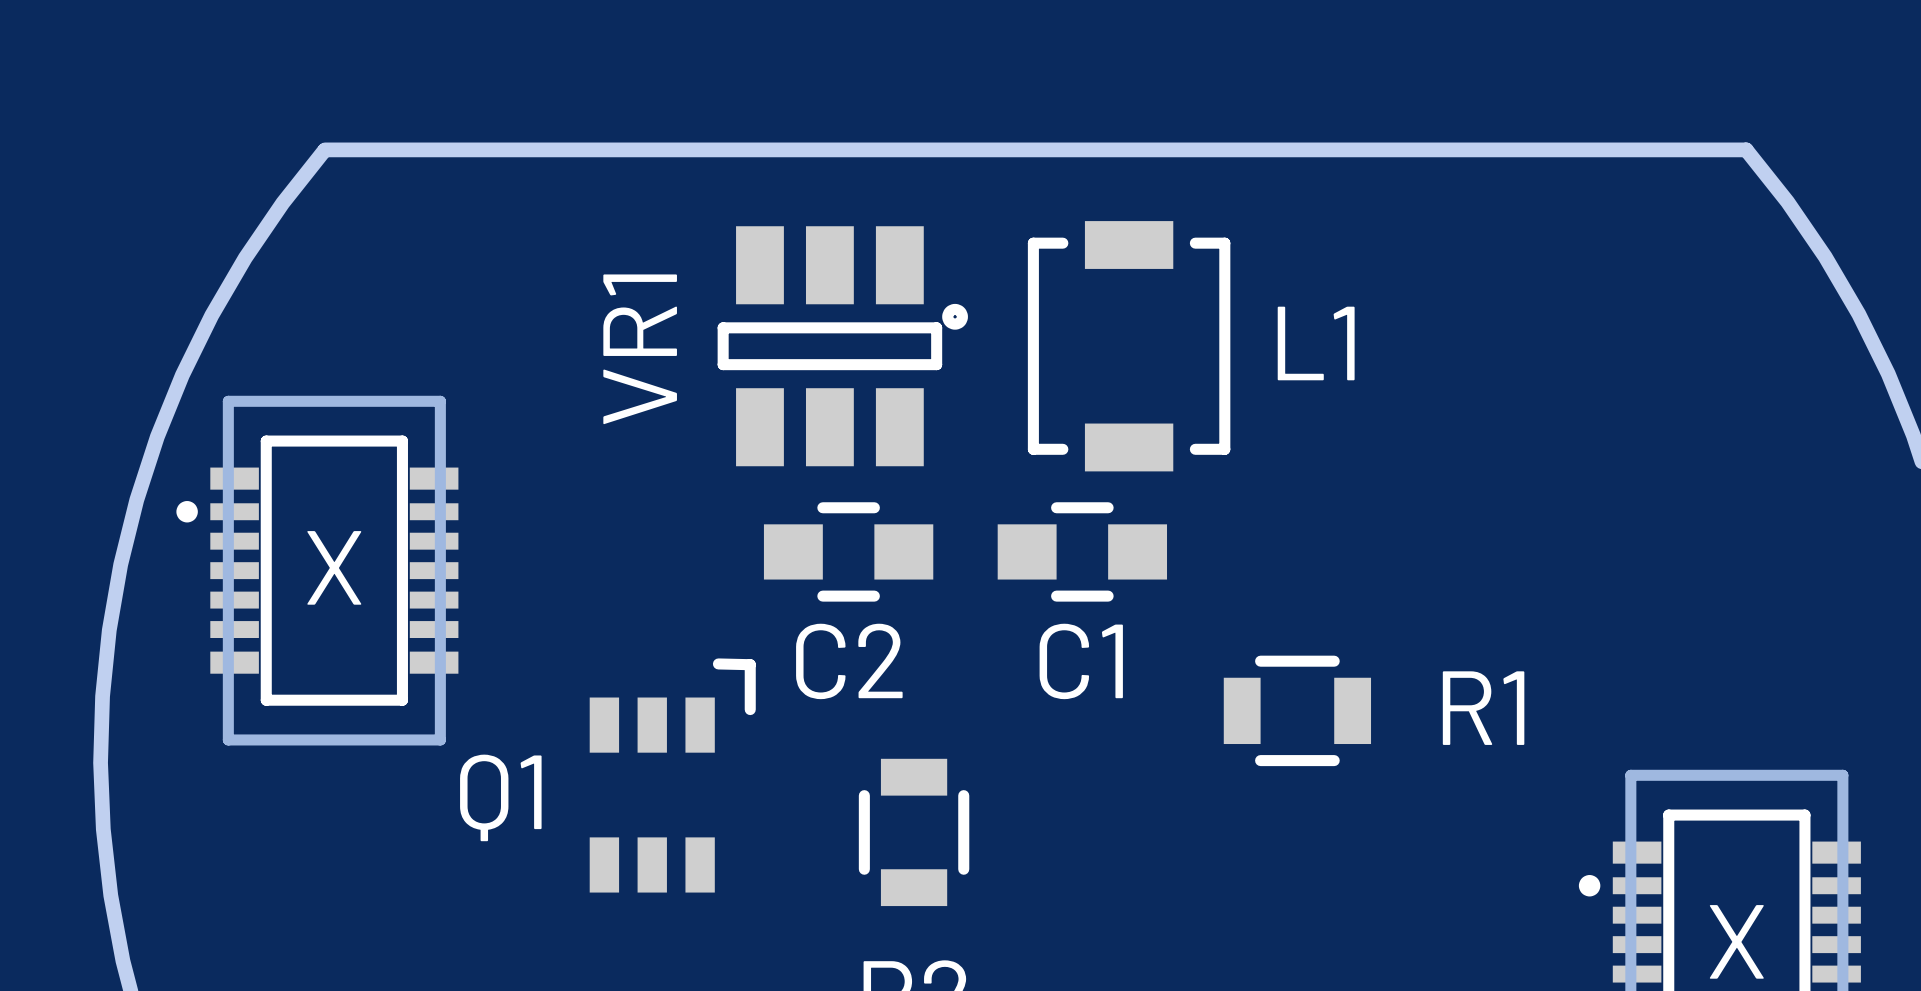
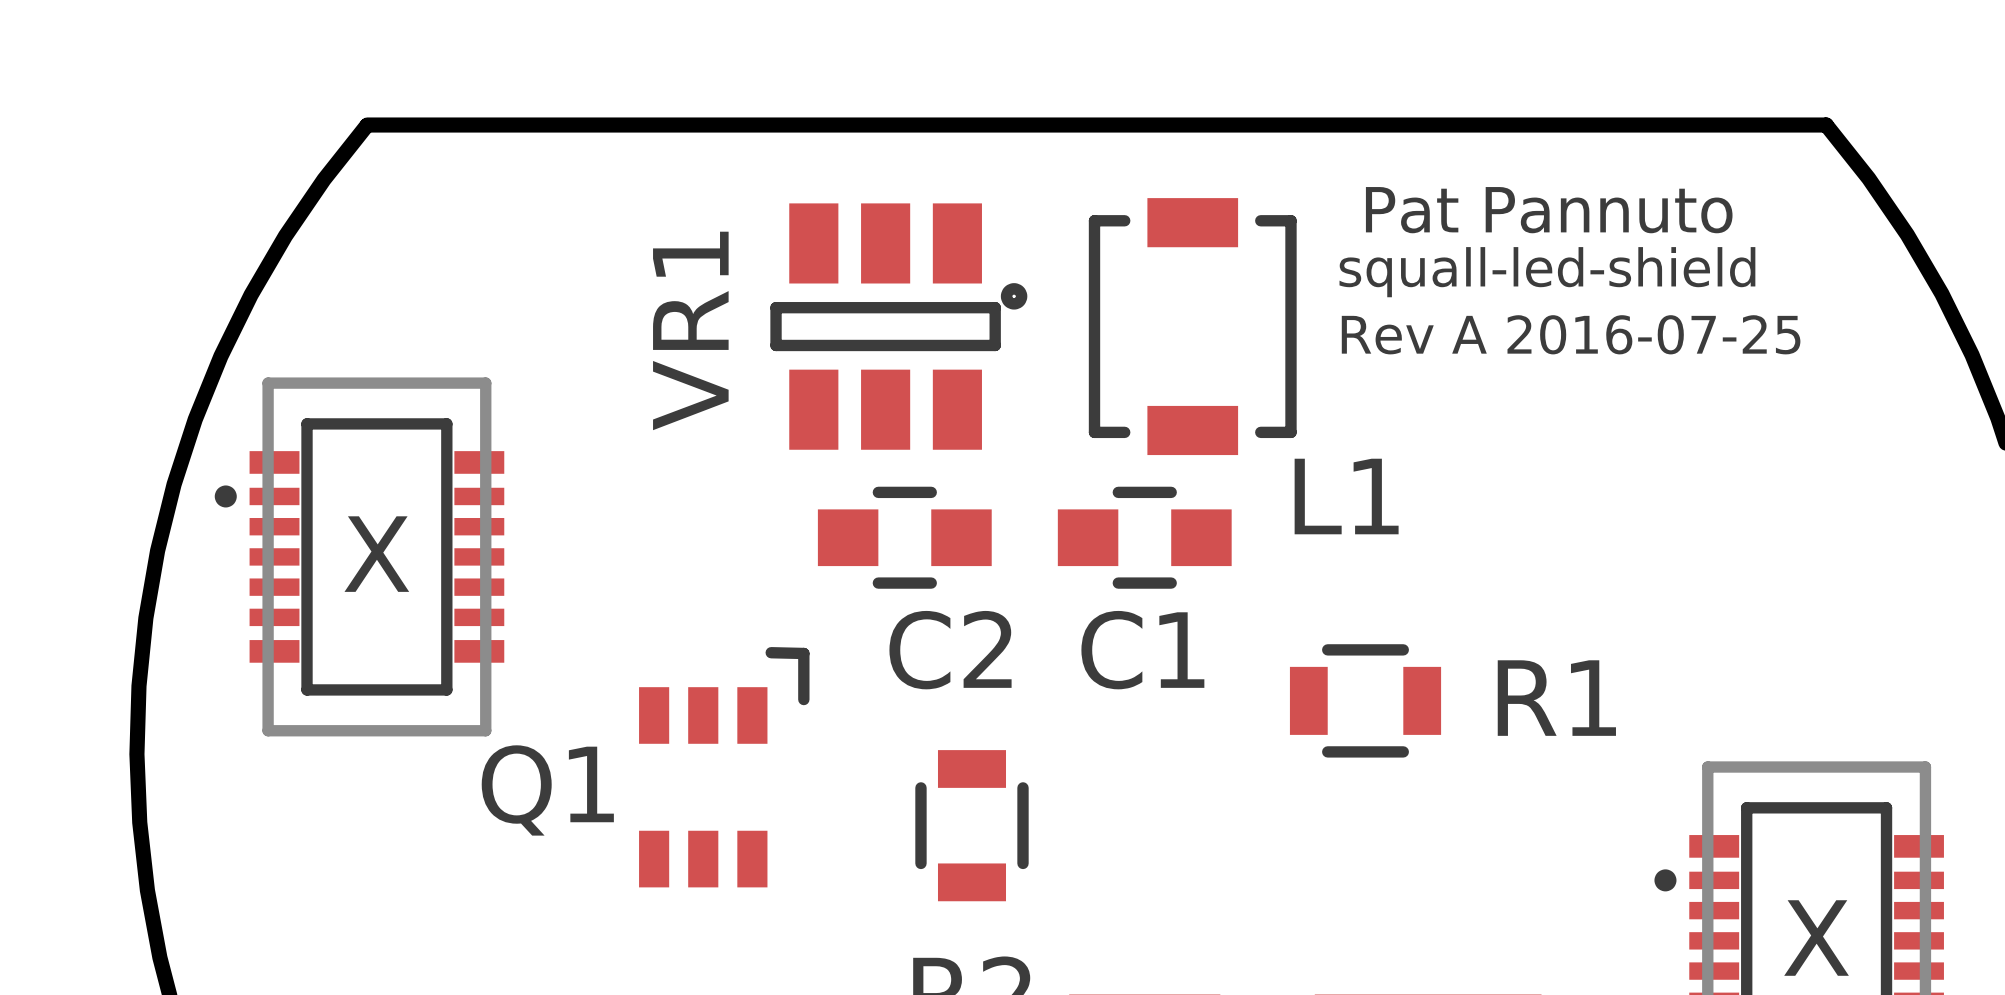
text: none -> Pat Pannuto (1549, 210)
text: none -> squall-led-shield (1547, 272)
L1 name position: L1 (1316, 343) -> L1 (1346, 496)
text: none -> Rev A 2016-07-25 (1571, 334)
C2 name position: C2 (849, 661) -> C2 (950, 650)

